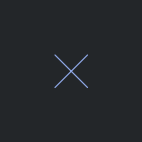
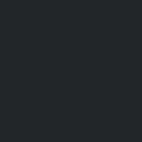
no-connect mark: (71, 71) -> none

